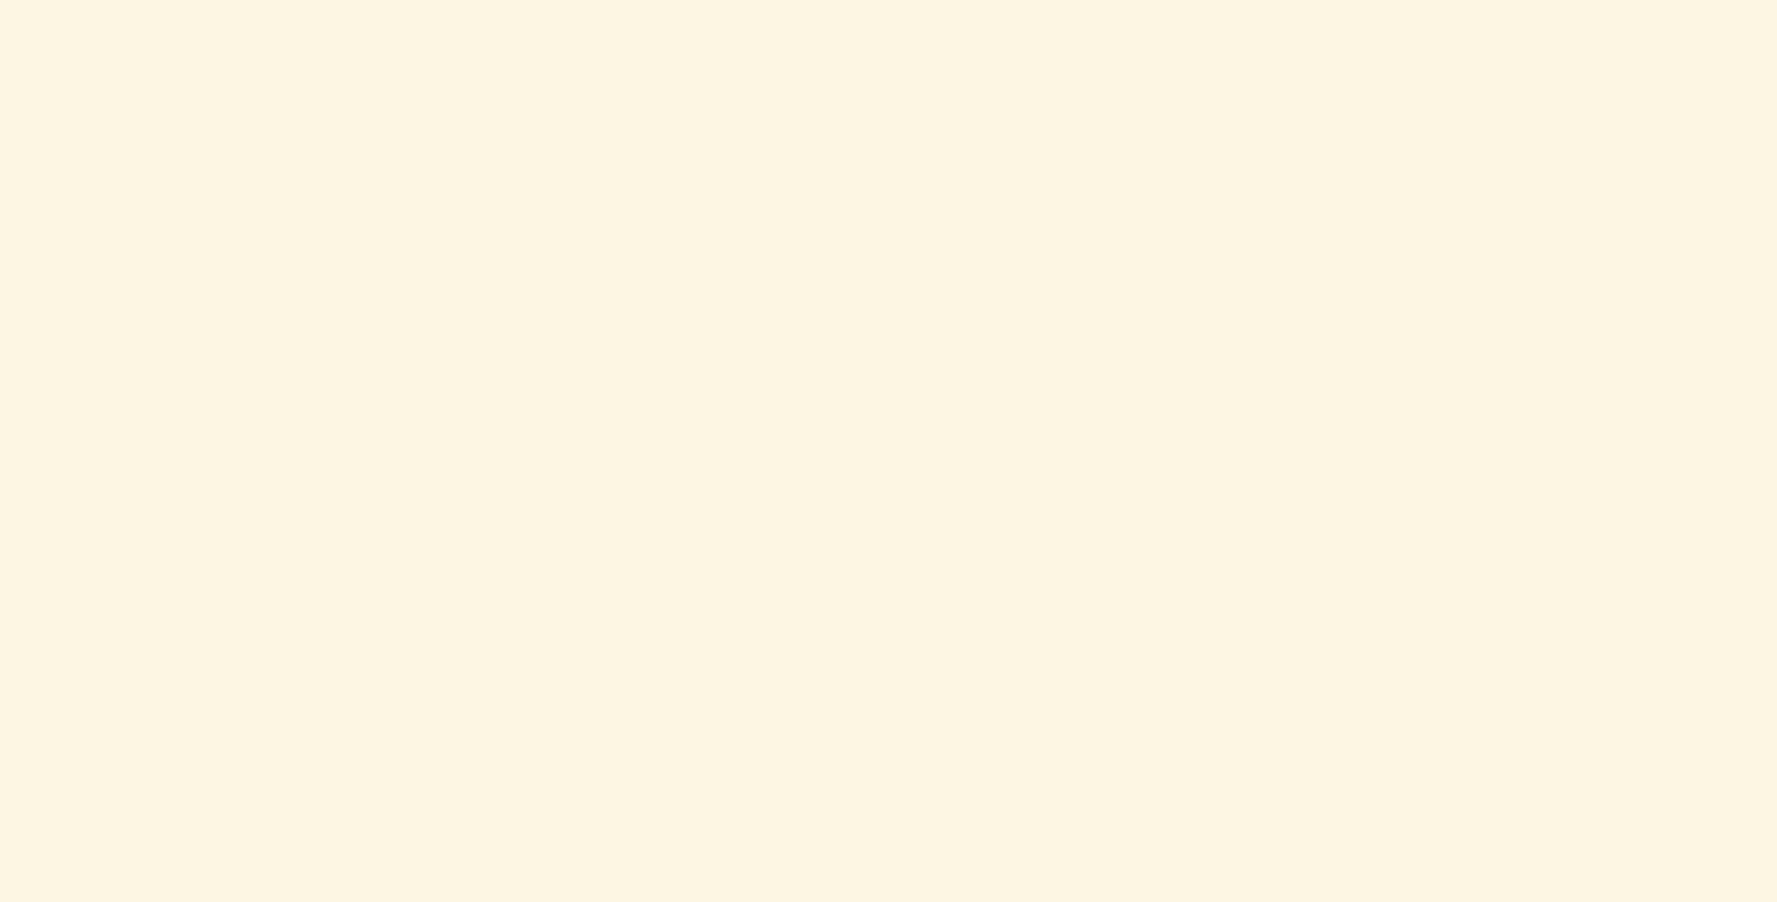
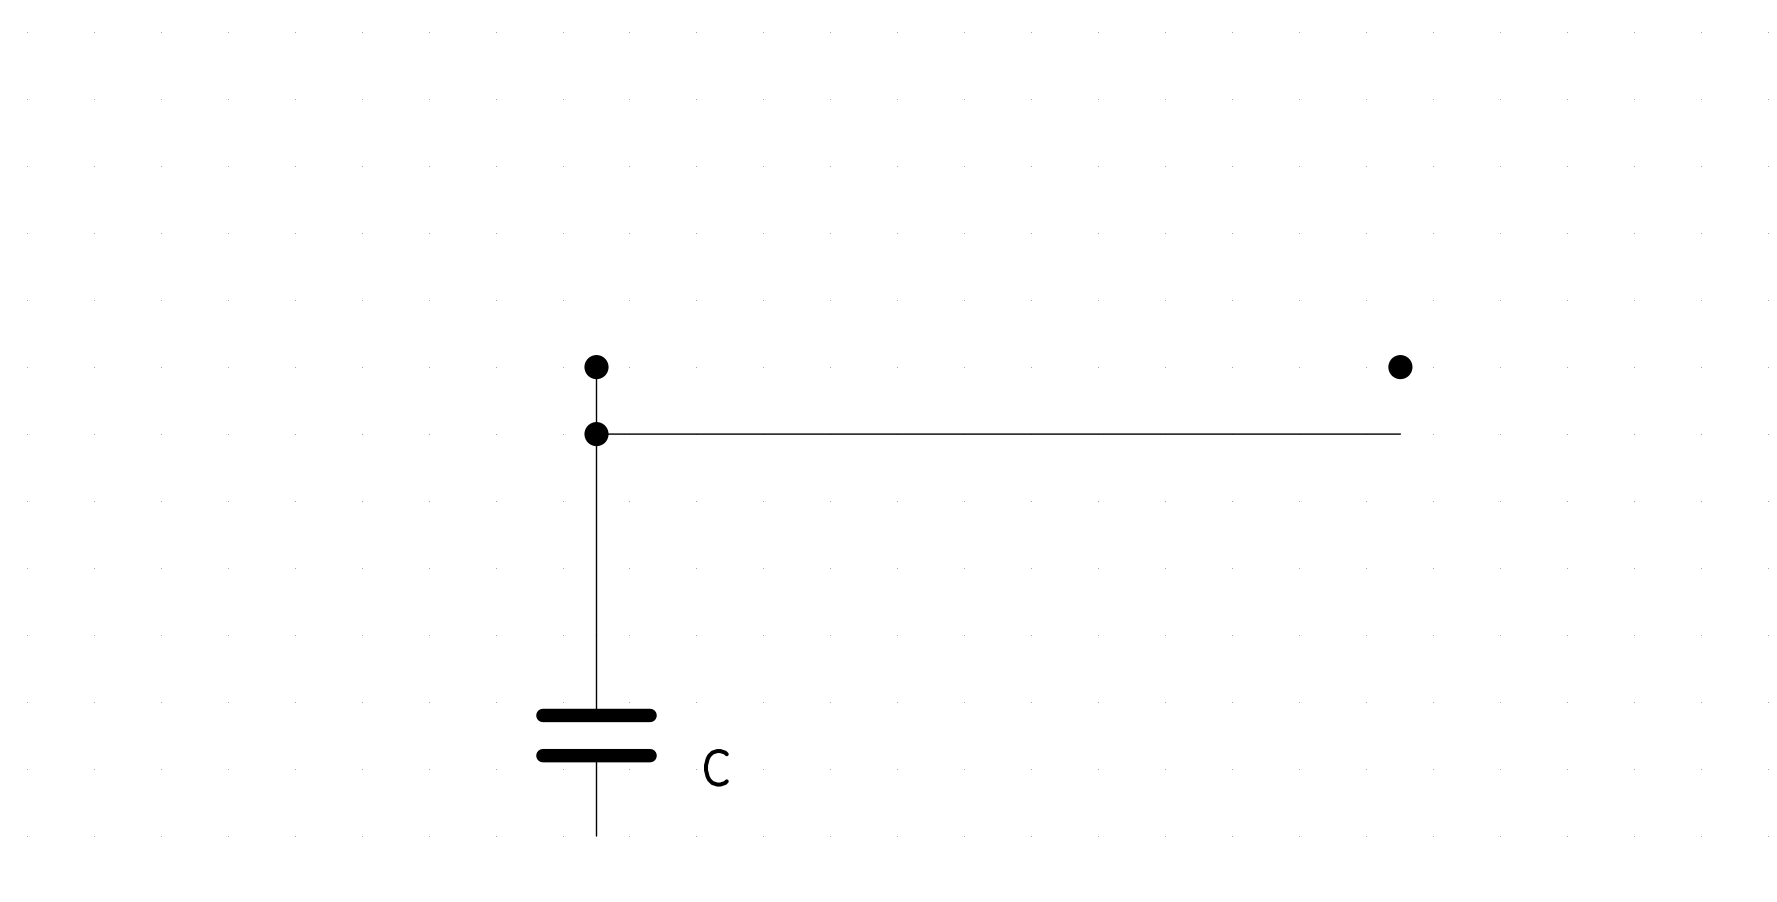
wire: none -> (596, 367) (596, 635)
junction: none -> (596, 367)
junction: none -> (1400, 367)
wire: none -> (596, 434) (1400, 434)
junction: none -> (596, 434)
part: none -> C (596, 735)

